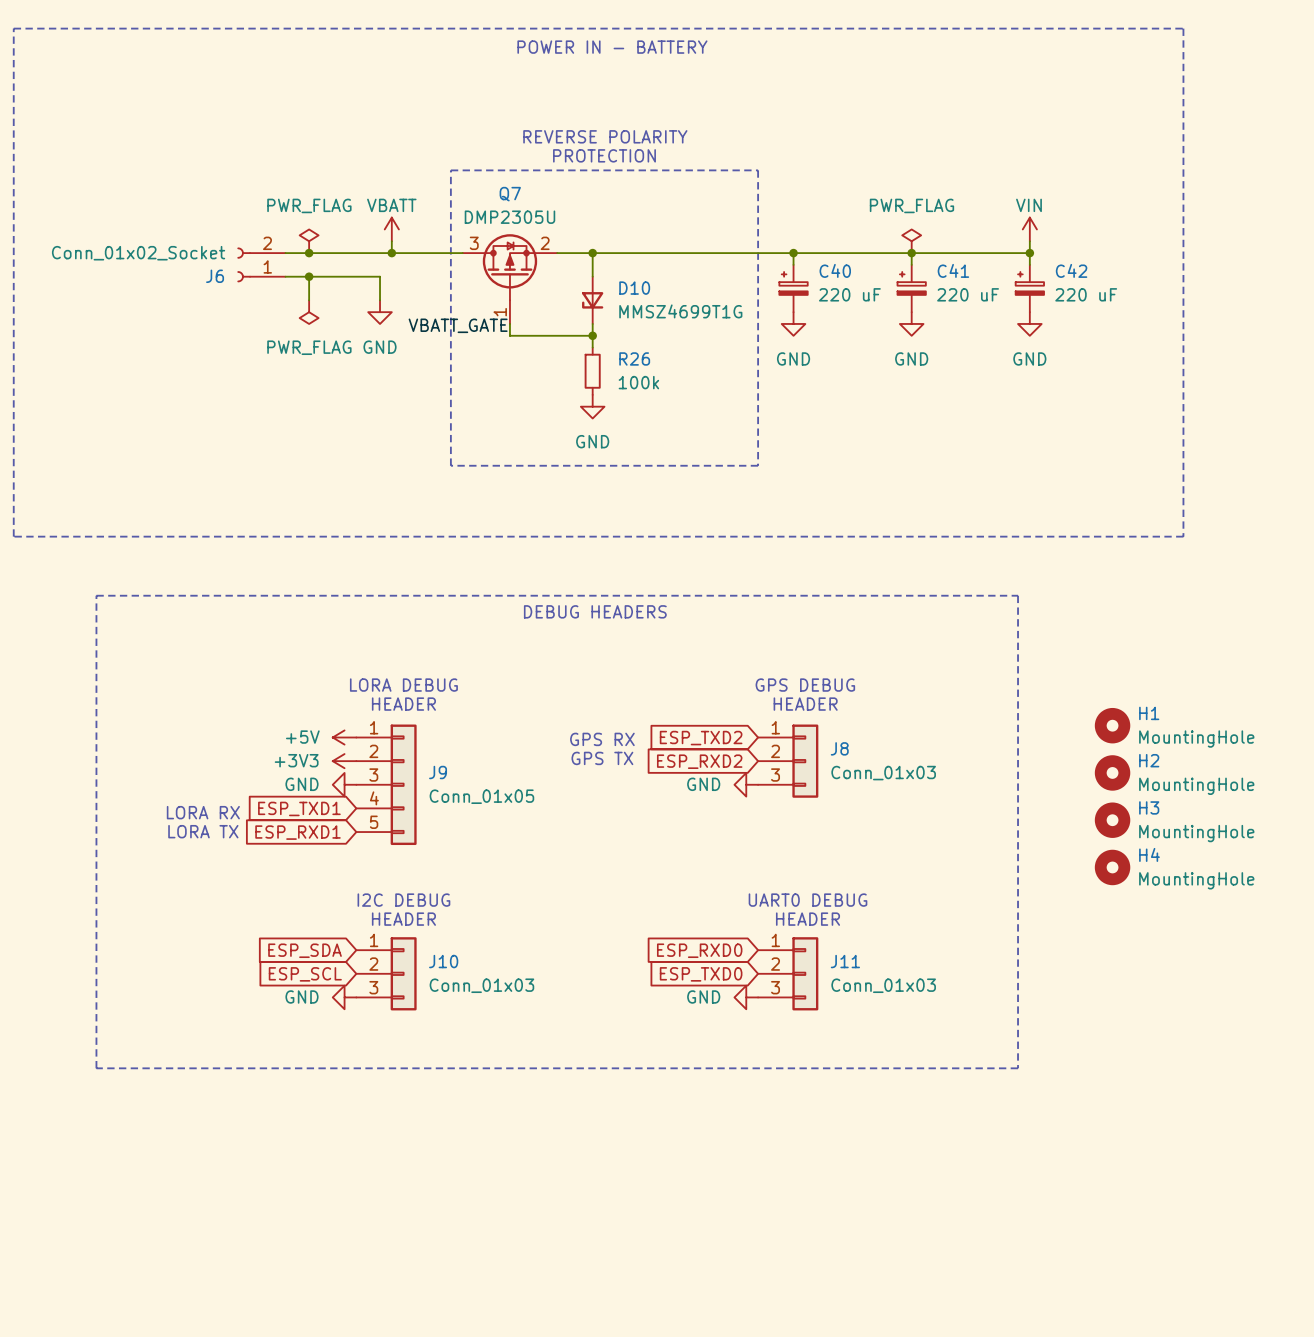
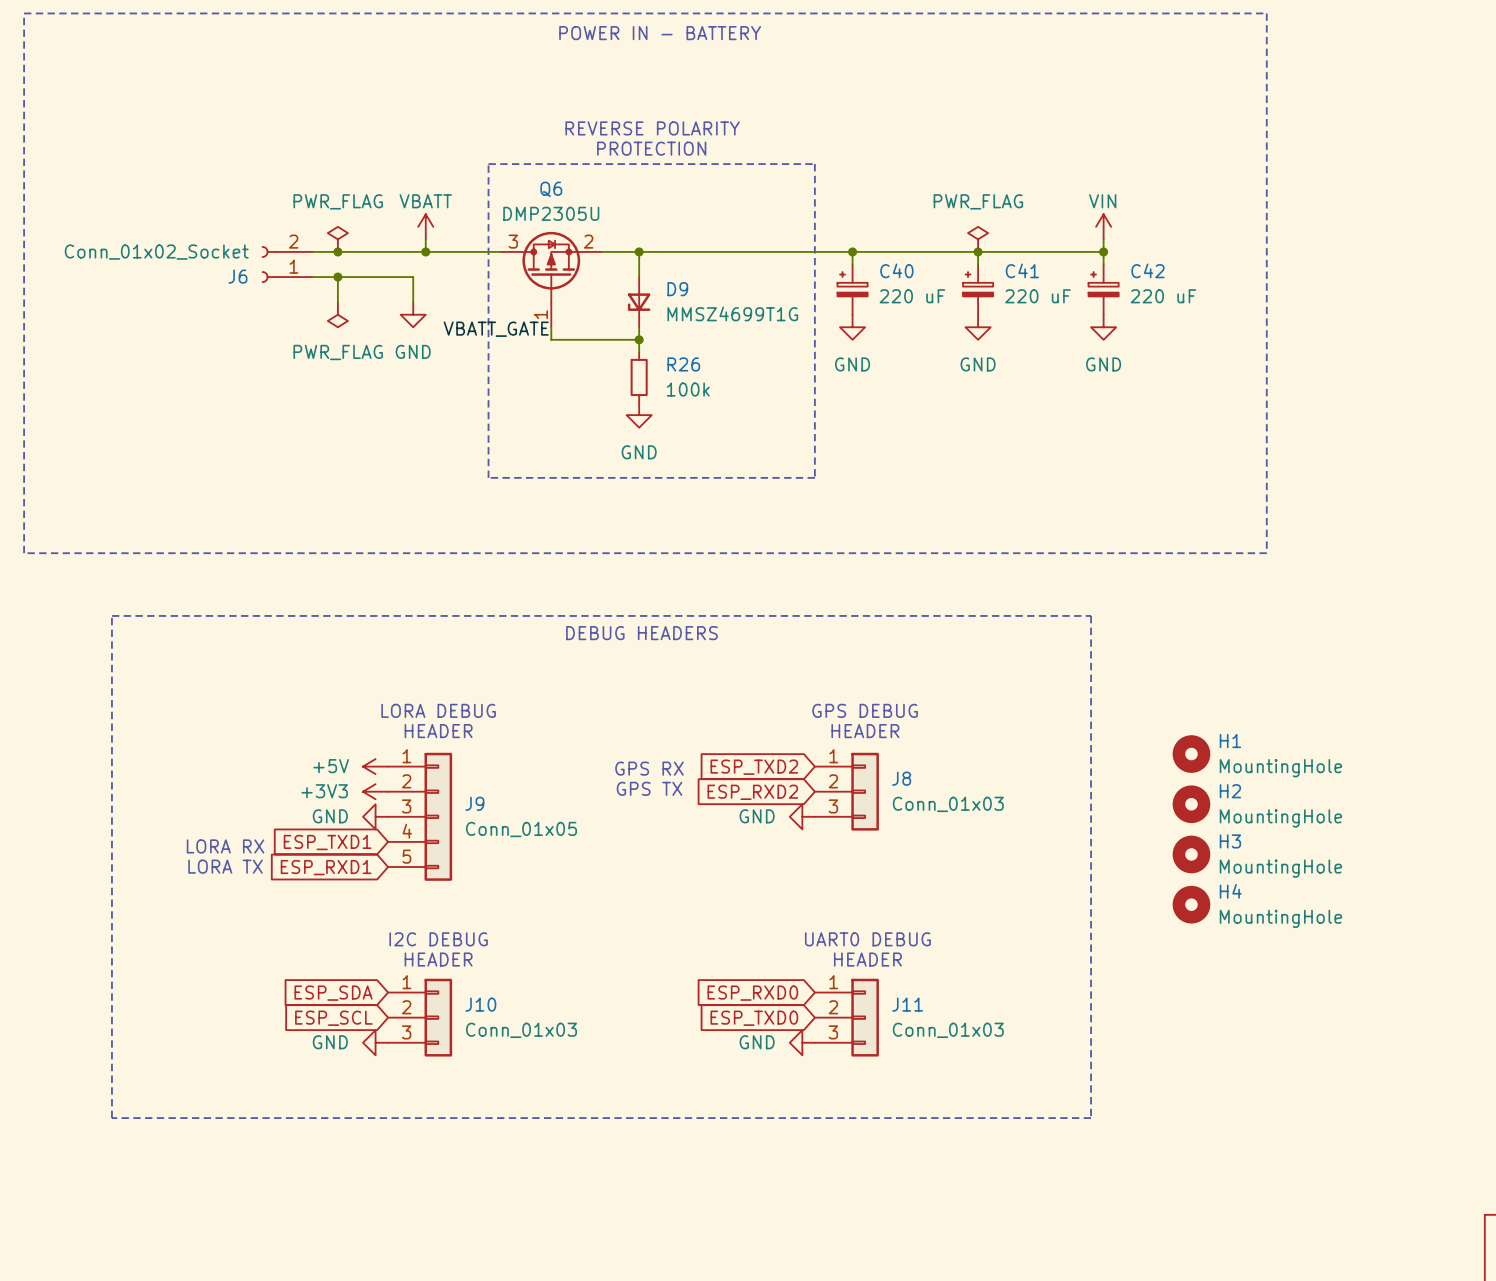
Q7 name: Q7 (510, 194) -> Q6 (551, 189)
D10 name: D10 (634, 288) -> D9 (677, 289)

